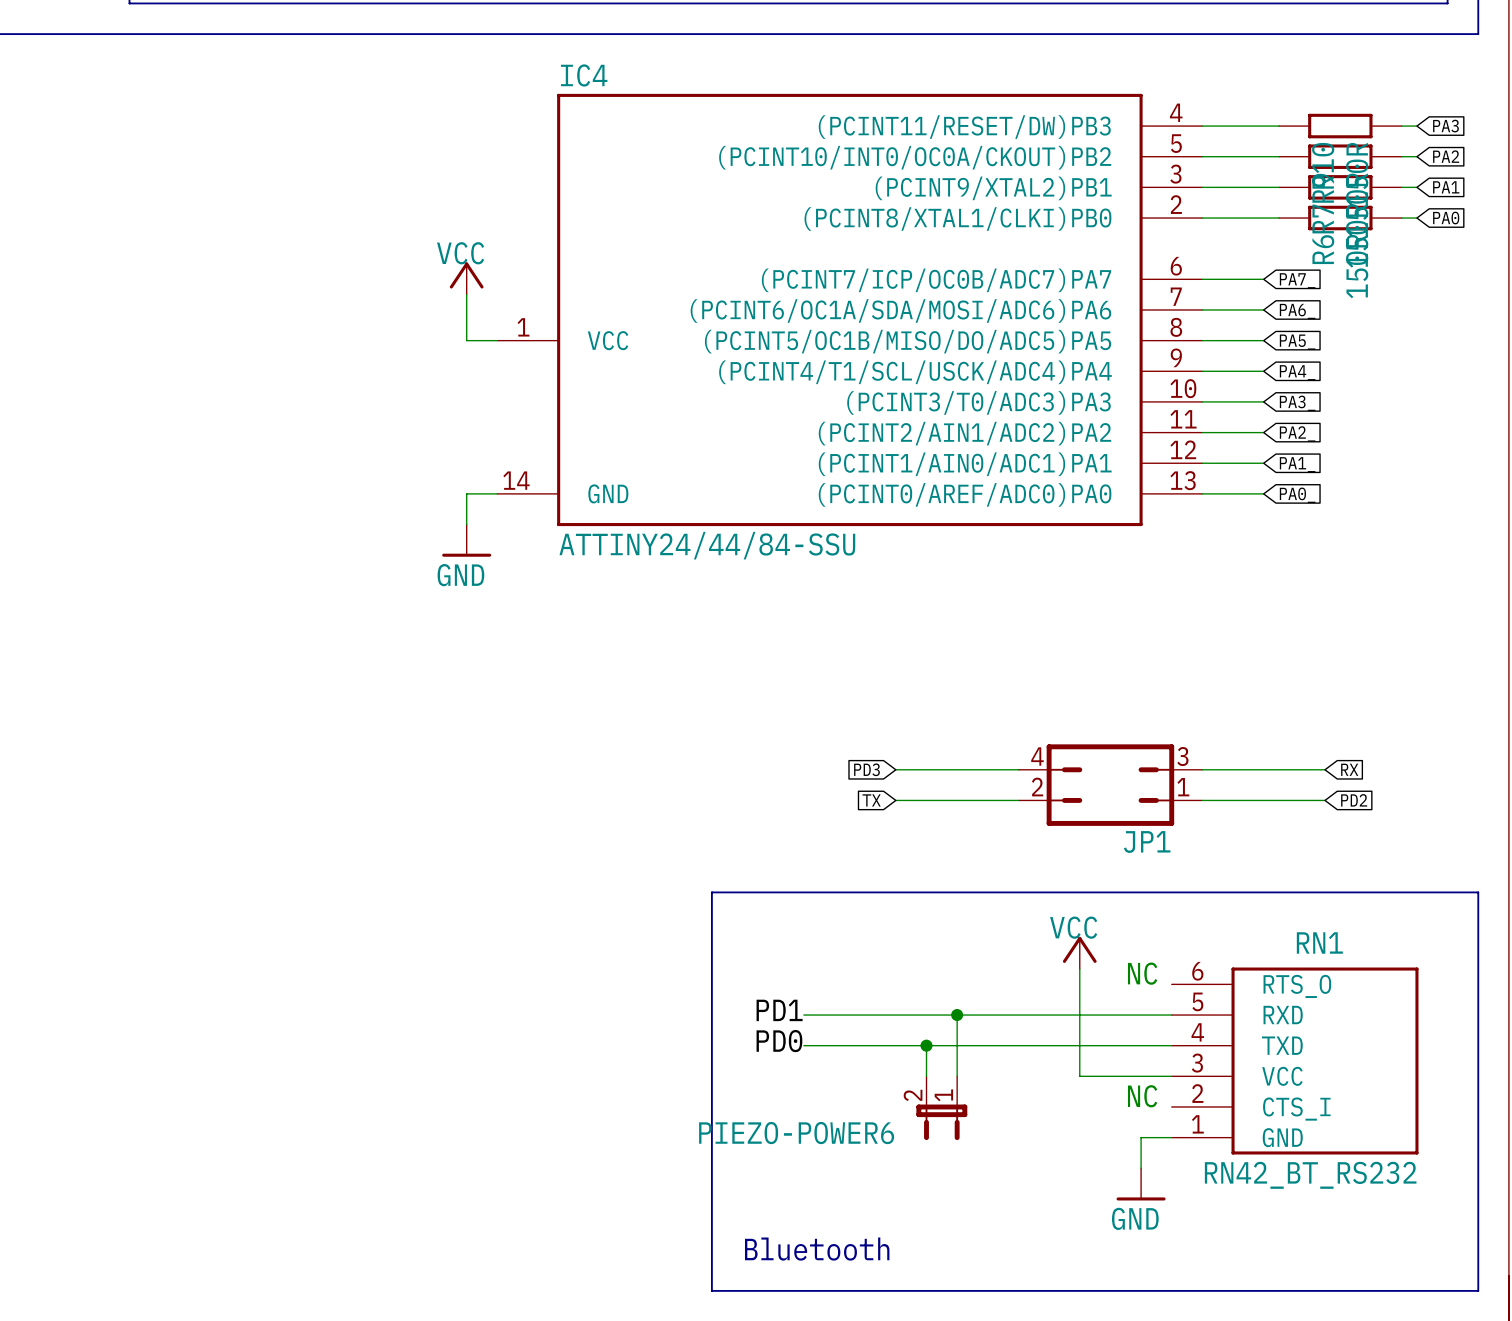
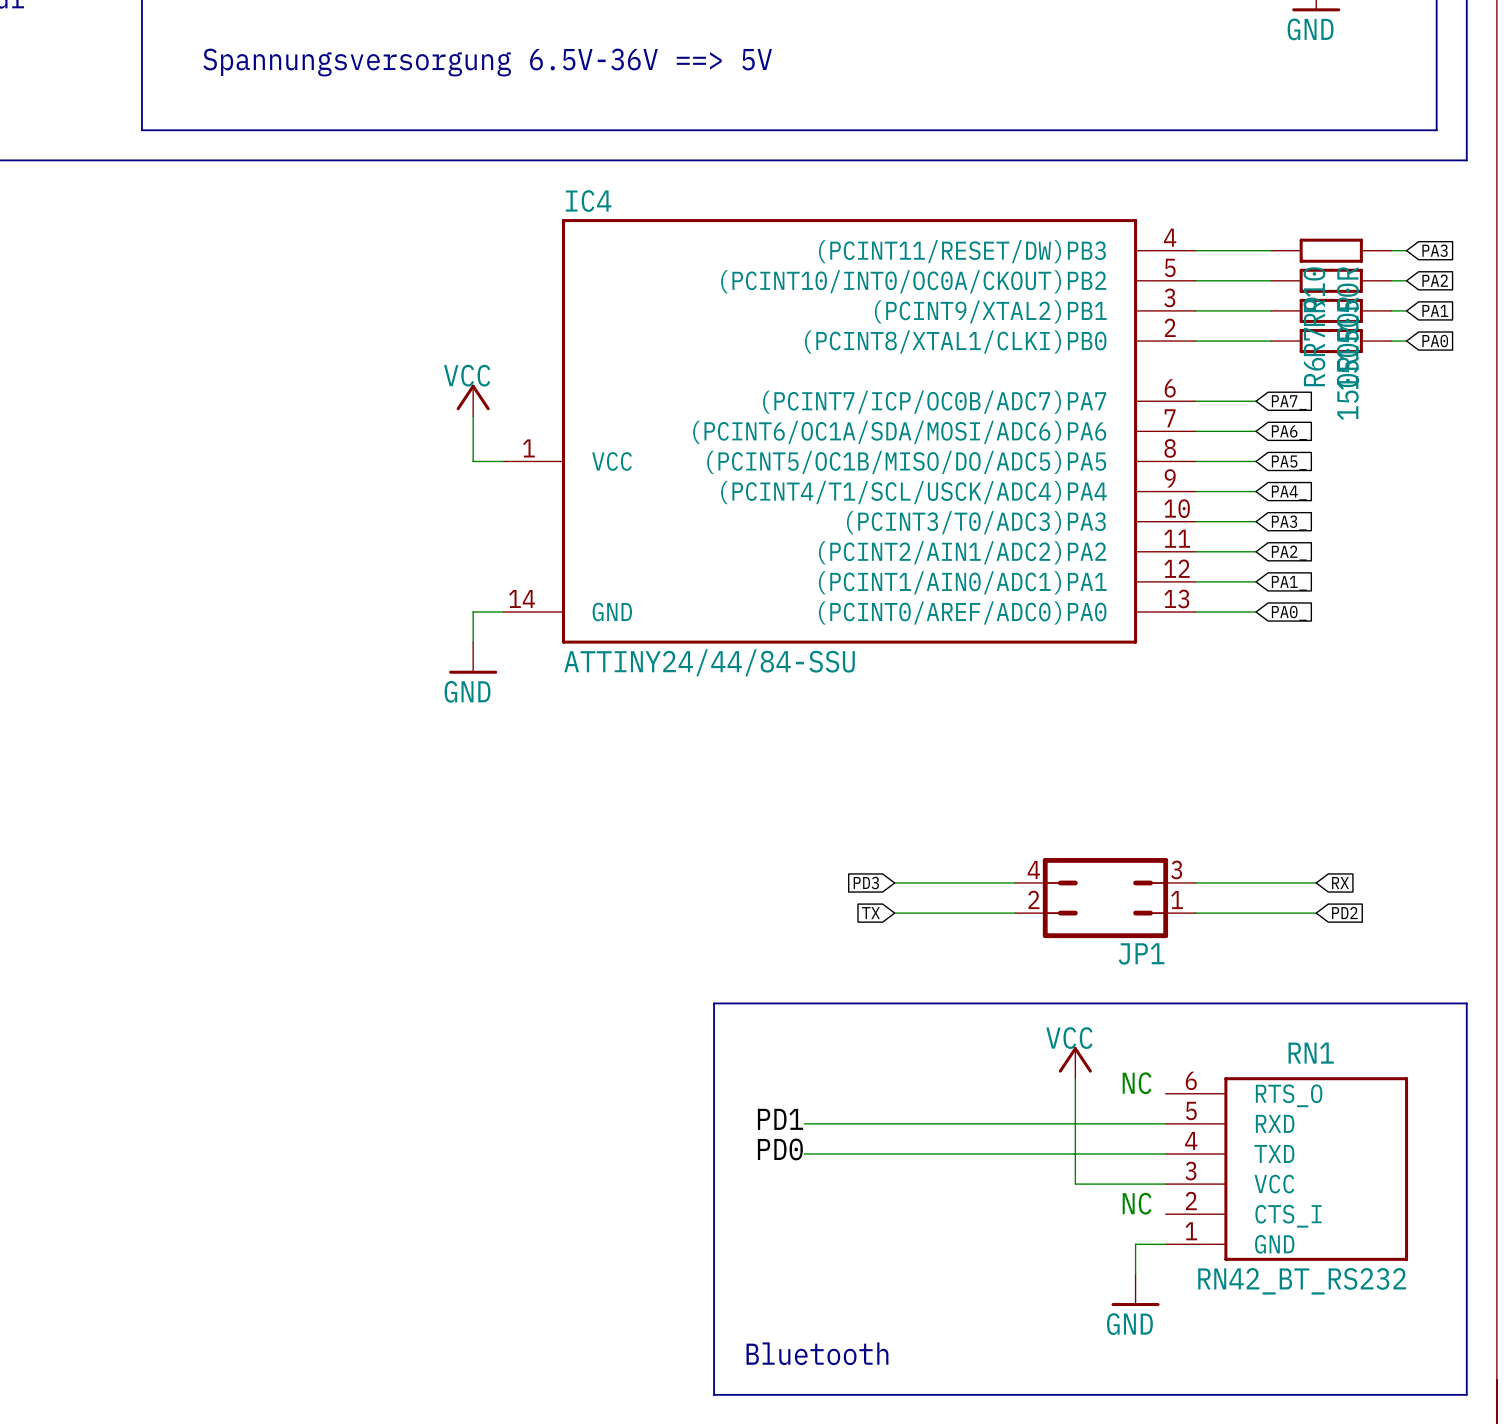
wire: (957, 1015) (957, 1076) -> none
junction: (957, 1015) -> none
wire: (926, 1045) (926, 1076) -> none
junction: (926, 1045) -> none
PIEZO-POWER6: (941, 1108) -> none

